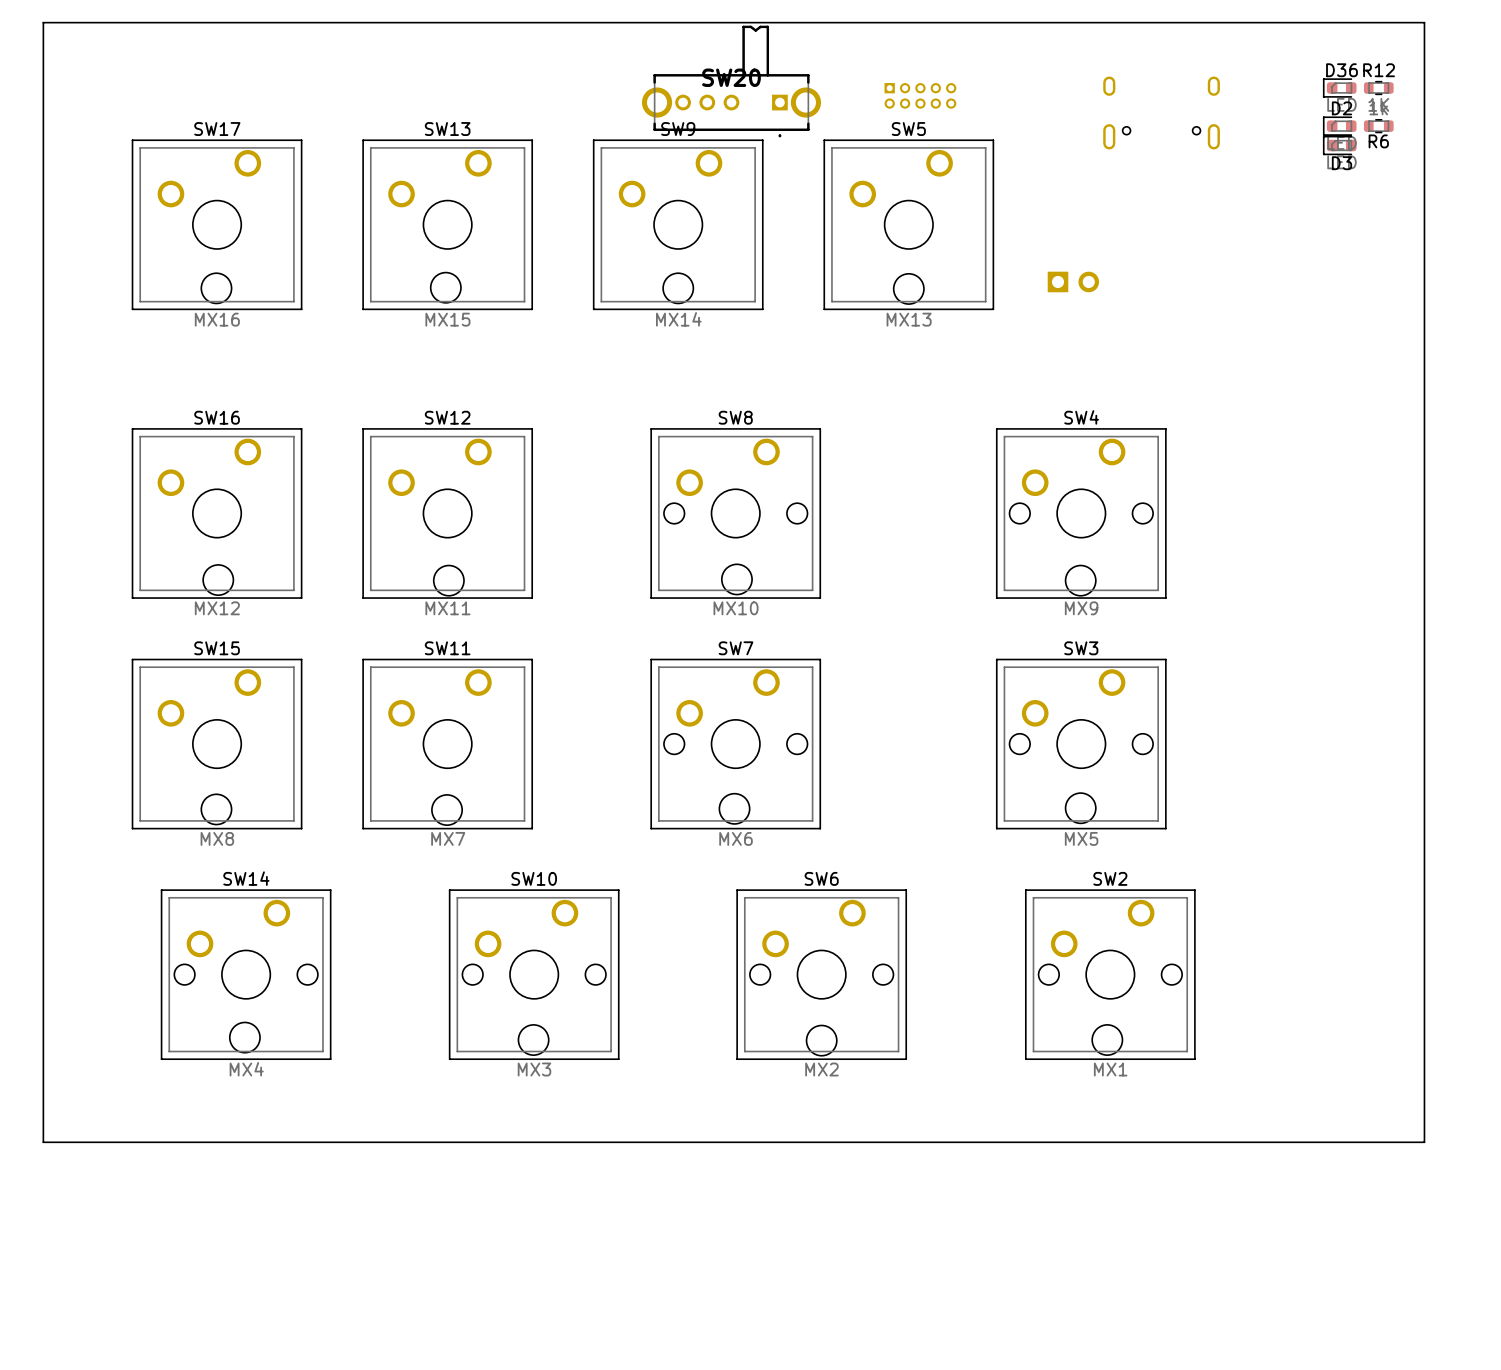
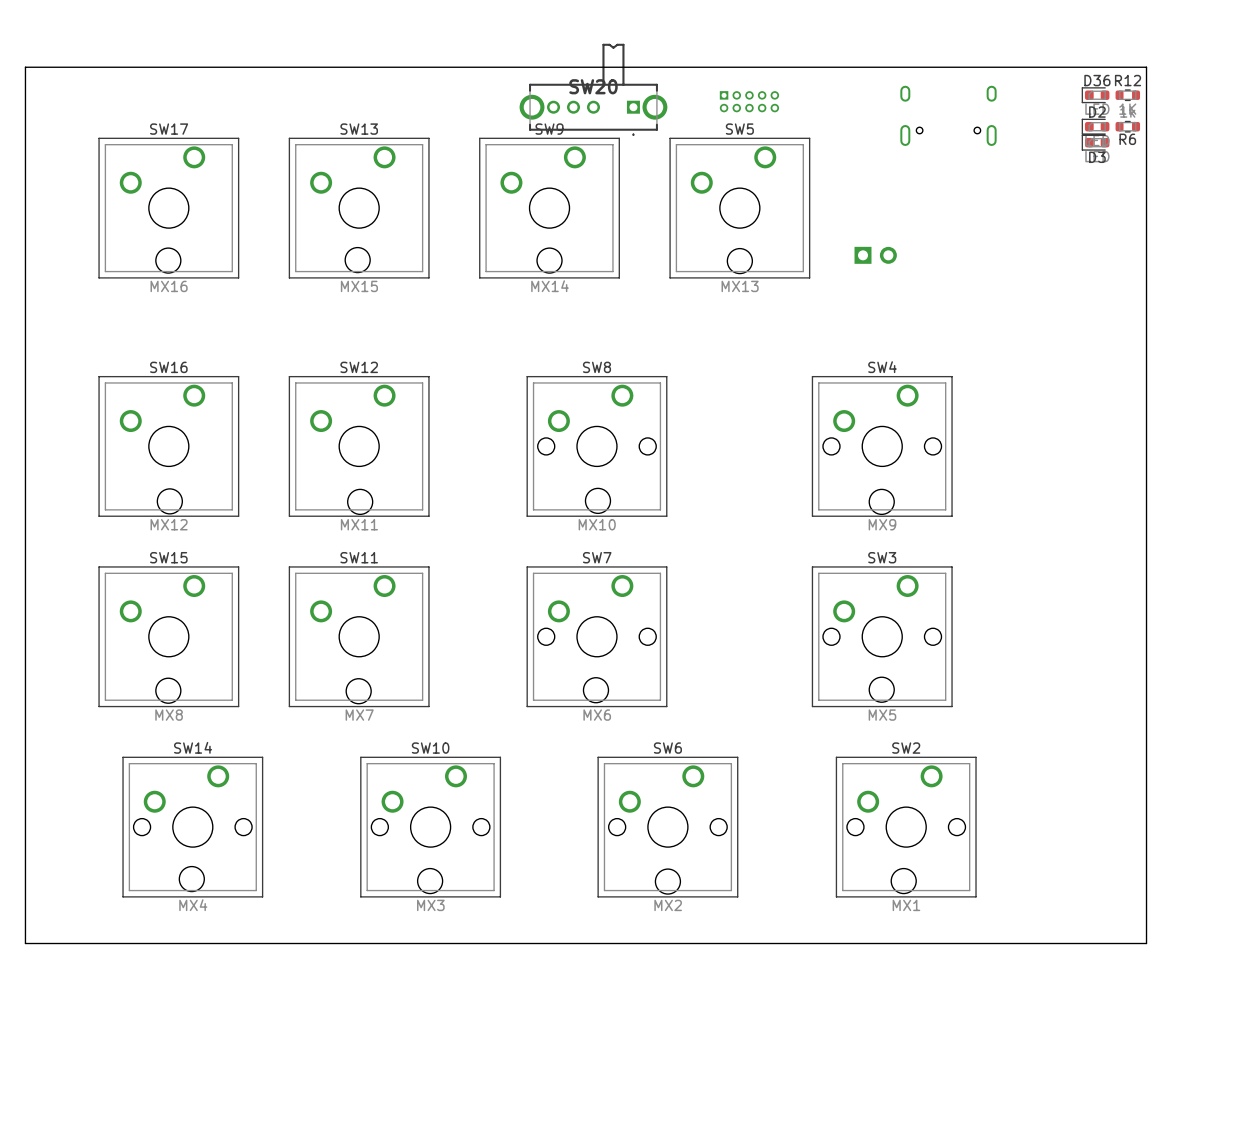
board edge: (43, 54) (43, 22) (1424, 22) (1424, 1142) (43, 1142) (43, 1115) -> (25, 67) (1146, 67) (1146, 943) (25, 943)

